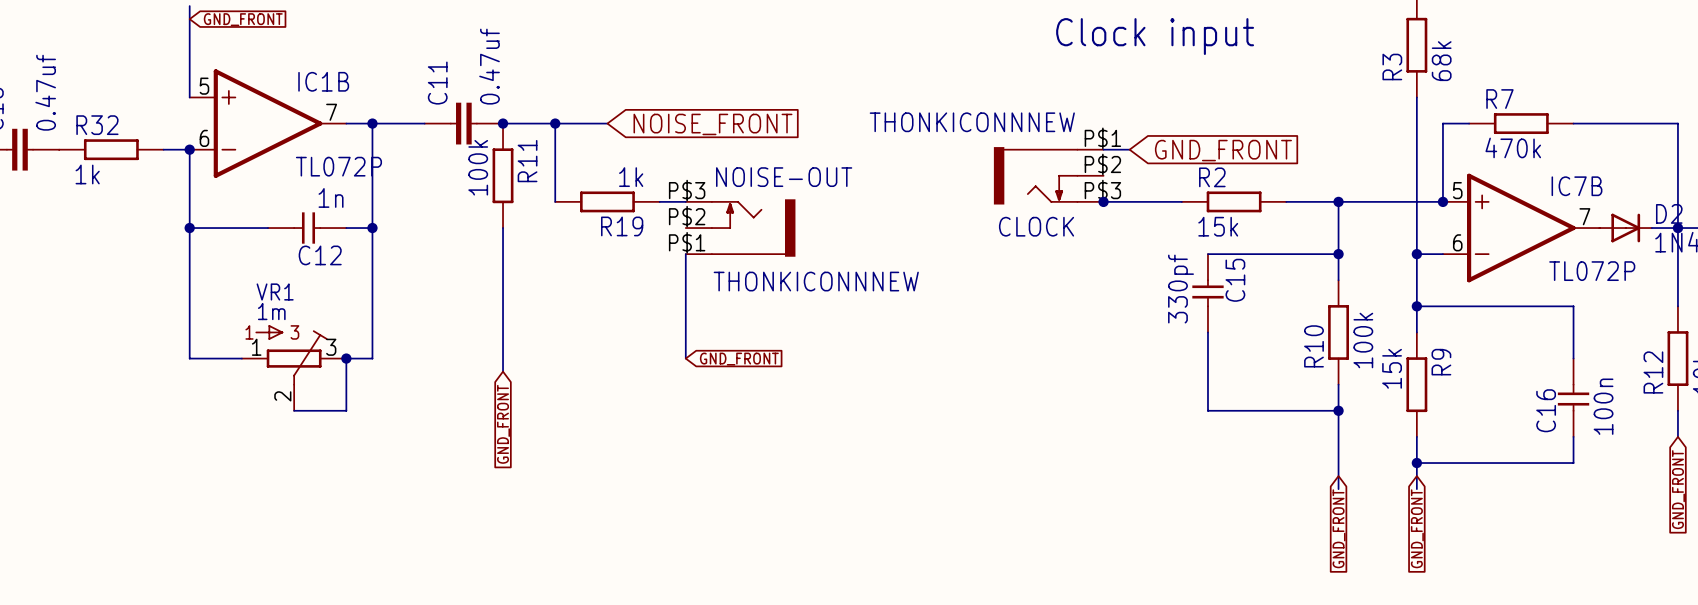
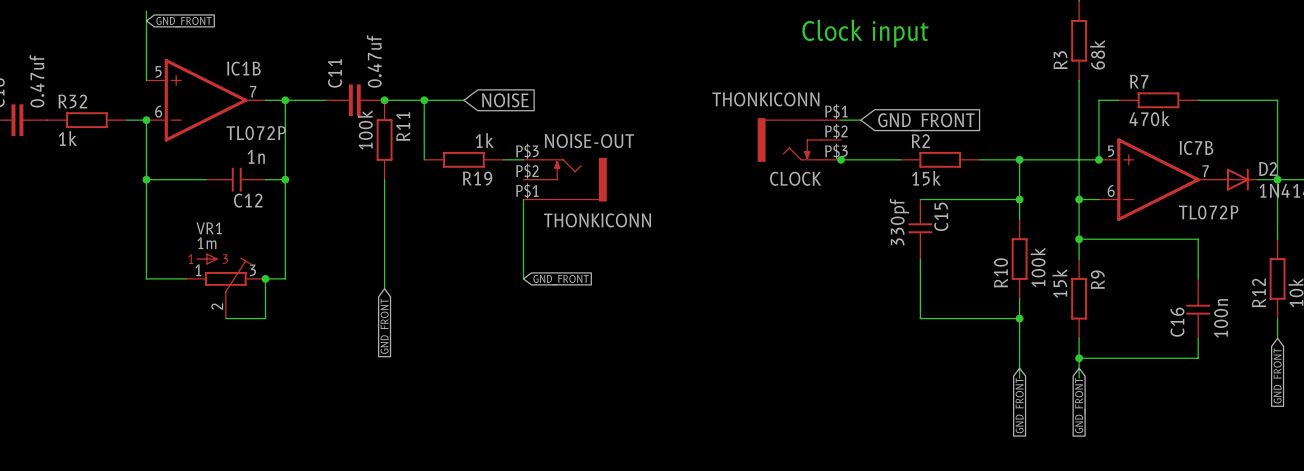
CLOCK value: THONKICONNNEW (972, 122) -> THONKICONN (765, 99)
global label: NOISE_FRONT (712, 124) -> NOISE (505, 100)
NOISE-OUT value: THONKICONNNEW (816, 281) -> THONKICONN (597, 220)

